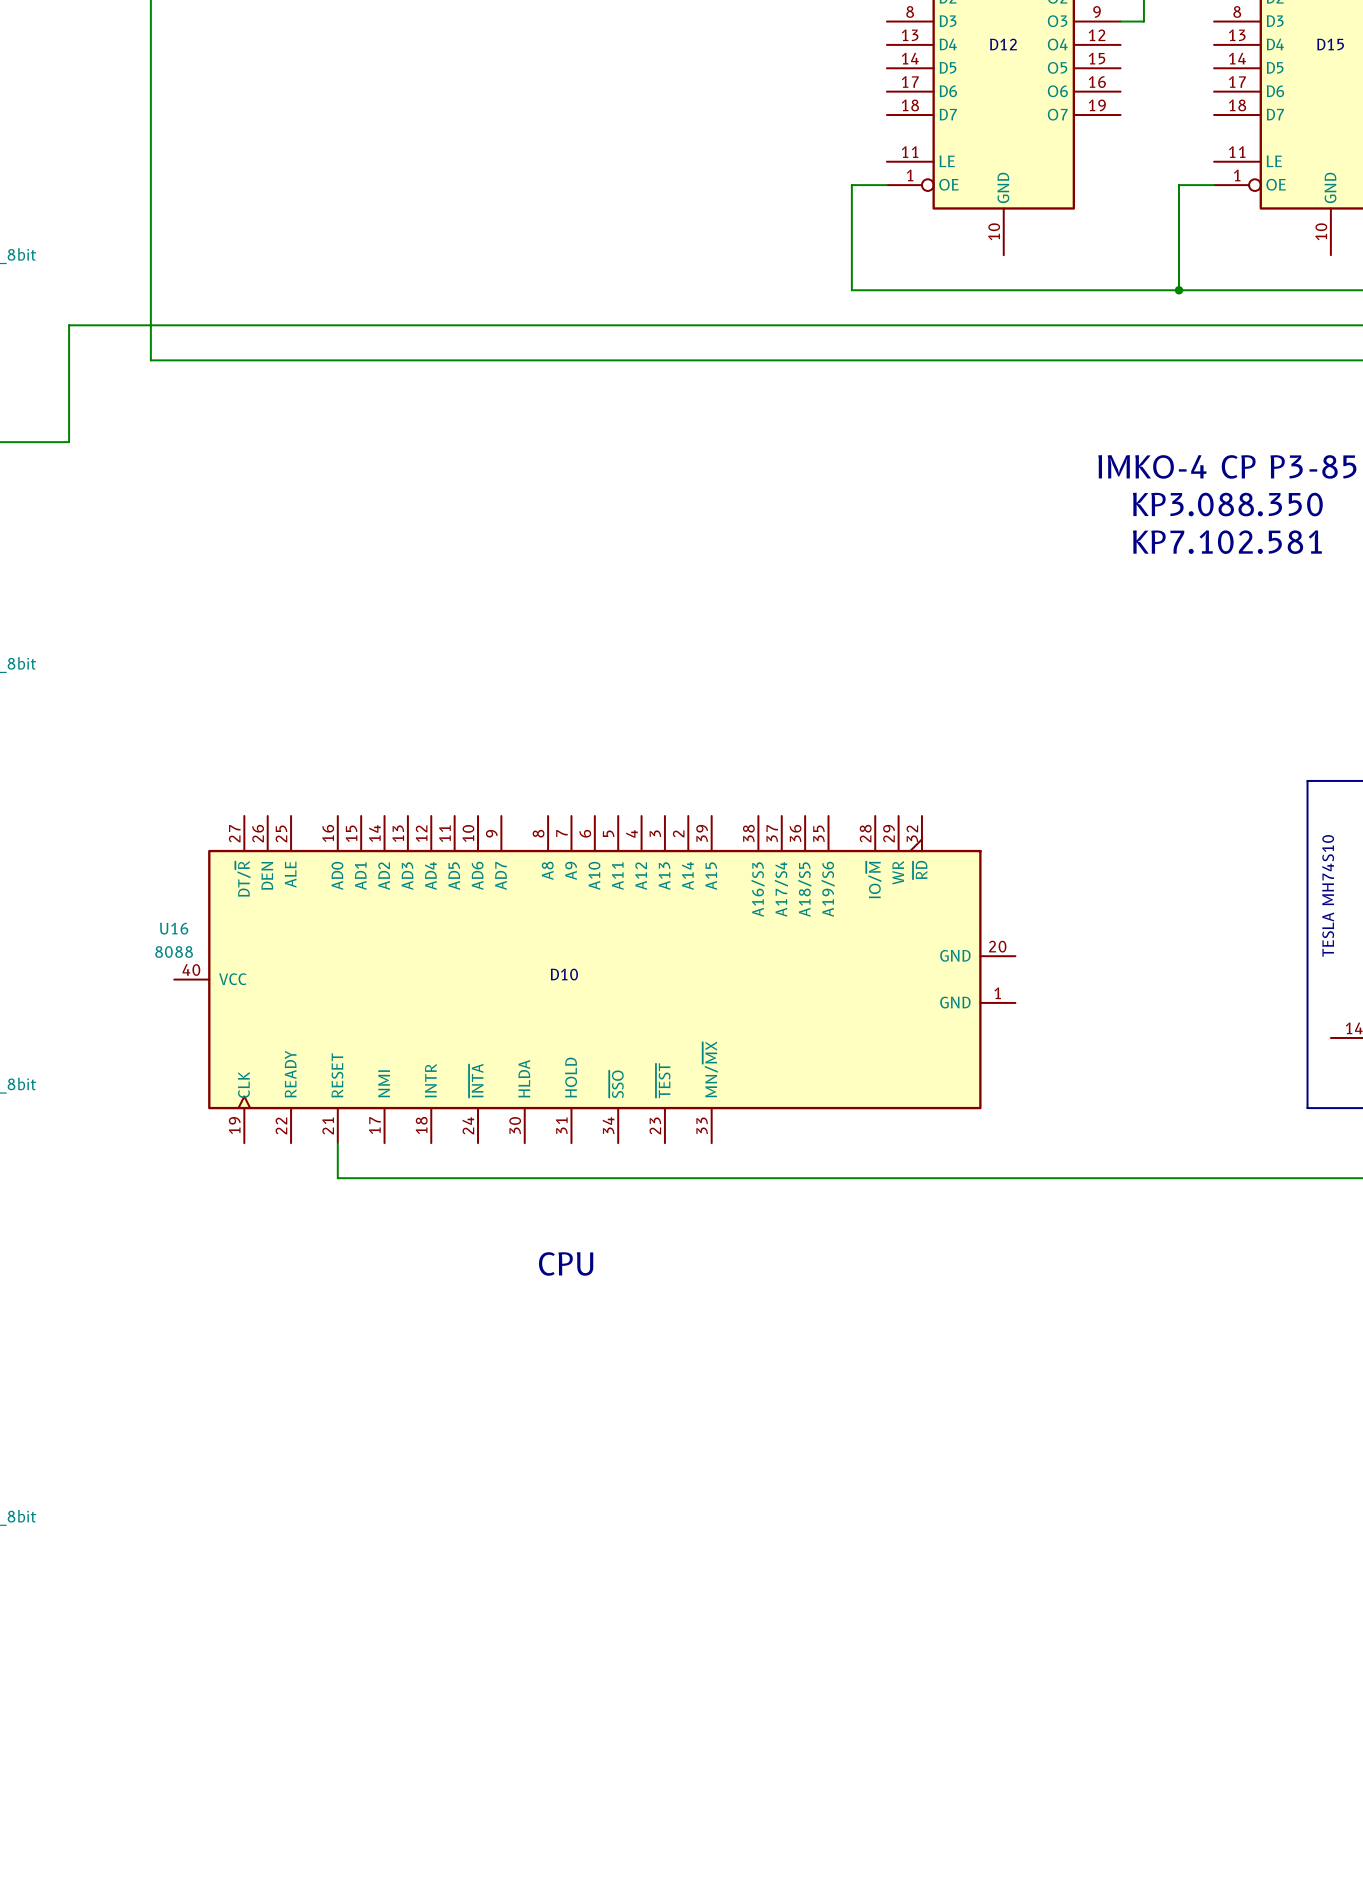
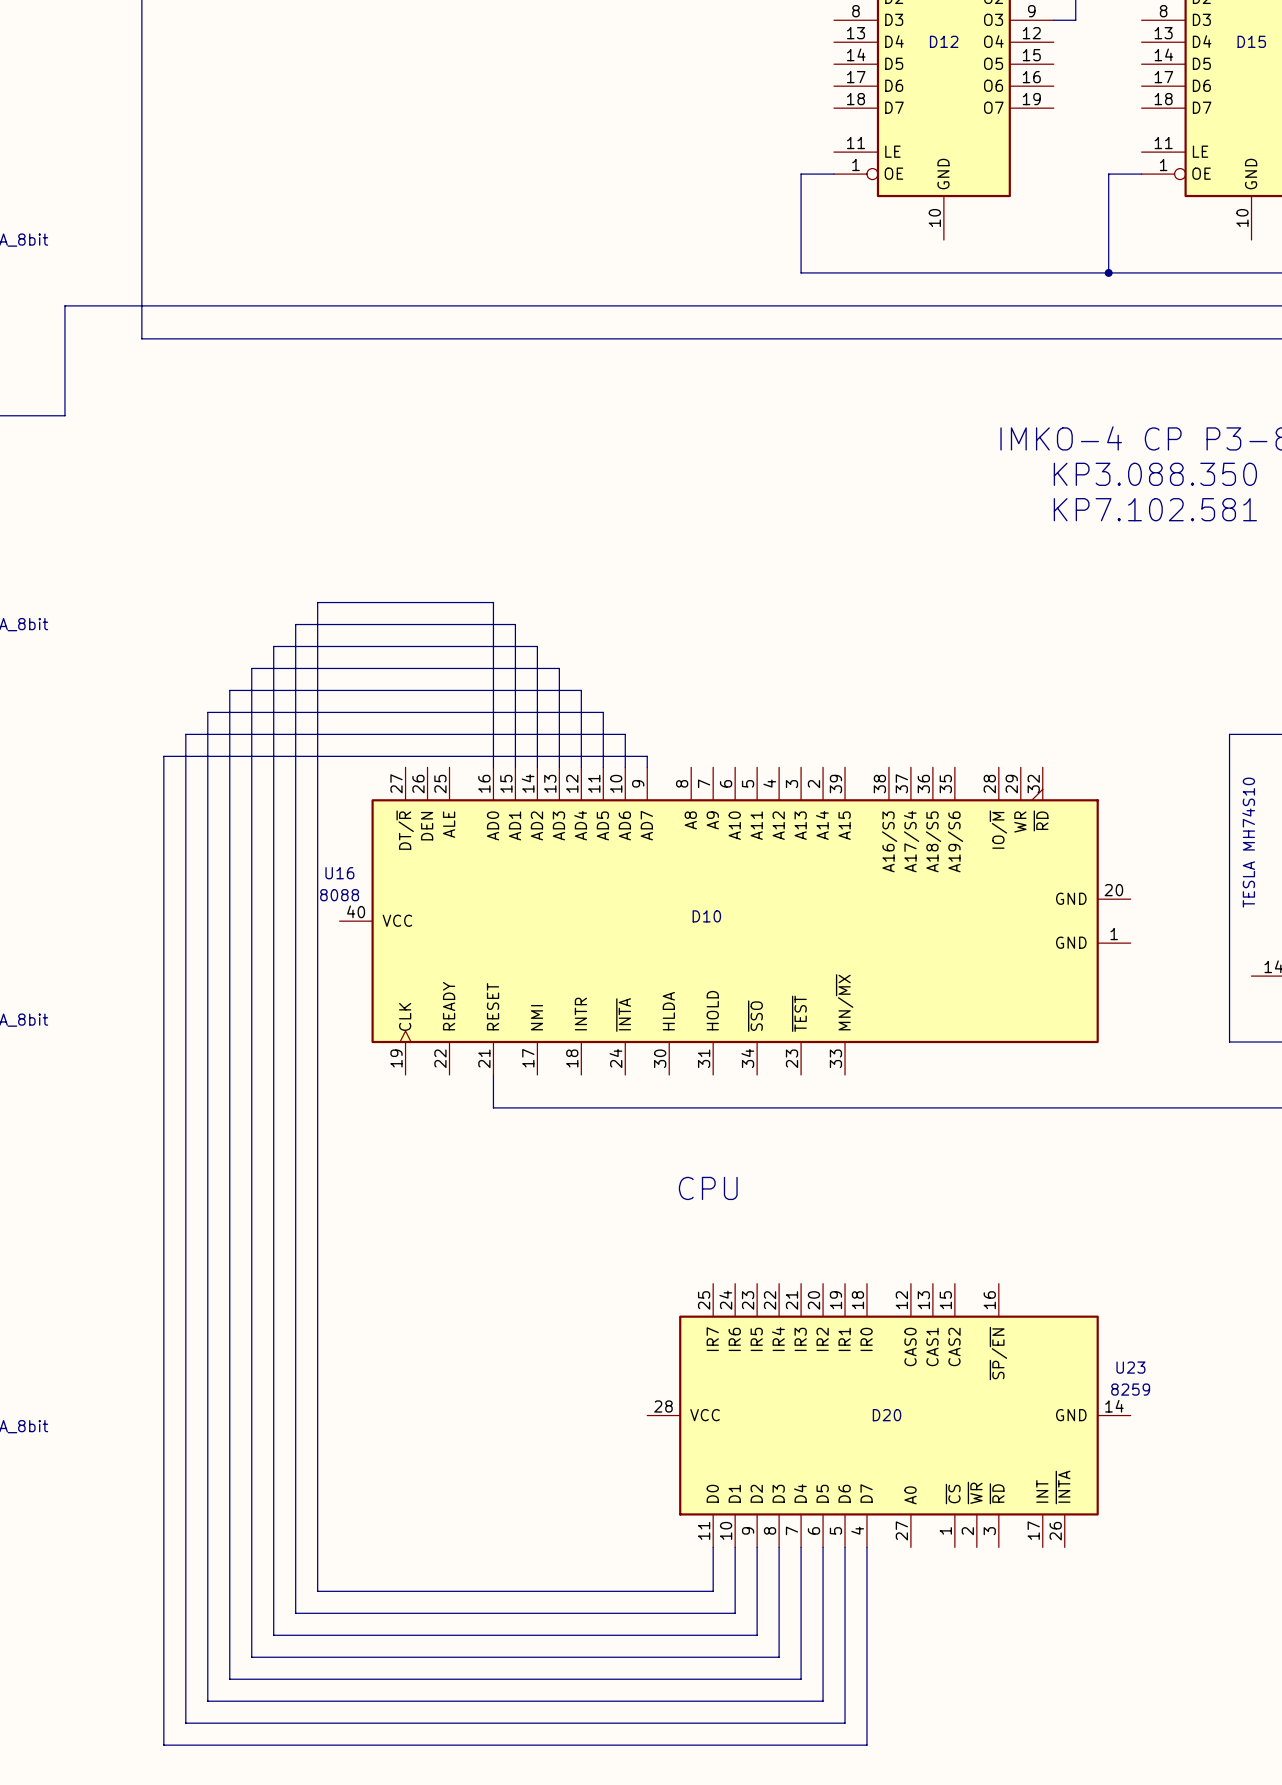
wire: none -> (493, 767) (493, 602) (317, 602) (317, 1074)
wire: none -> (515, 767) (515, 624) (295, 624) (295, 1613) (735, 1613) (735, 1547)
wire: none -> (537, 767) (537, 646) (273, 646) (273, 1635) (757, 1635) (757, 1547)
wire: none -> (559, 767) (559, 668) (251, 668) (251, 1657) (779, 1657) (779, 1547)
wire: none -> (581, 767) (581, 690) (229, 690) (229, 1679) (801, 1679) (801, 1547)
wire: none -> (603, 767) (603, 712) (207, 712) (207, 1701) (823, 1701) (823, 1547)
wire: none -> (625, 767) (625, 734) (185, 734) (185, 1723) (845, 1723) (845, 1547)
wire: none -> (647, 767) (647, 756) (163, 756) (163, 1745) (866, 1745) (866, 1547)
text position: D10 (564, 974) -> D10 (706, 916)
U16 position: (594, 979) -> (735, 921)
wire: (337, 1178) (524, 1178) -> (493, 1074) (493, 1107)
wire: none -> (317, 1107) (317, 1591) (713, 1591) (713, 1547)
text position: CPU (566, 1263) -> CPU (708, 1188)
text: none -> D20 (887, 1415)
U23: none -> 8259 (888, 1415)

